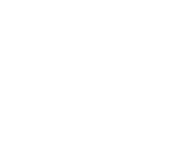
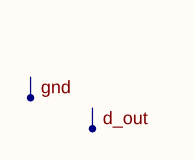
wire: none -> (30, 77) (30, 97)
label: none -> gnd (55, 88)
junction: none -> (30, 97)
wire: none -> (92, 108) (92, 128)
label: none -> d_out (125, 119)
junction: none -> (92, 128)

